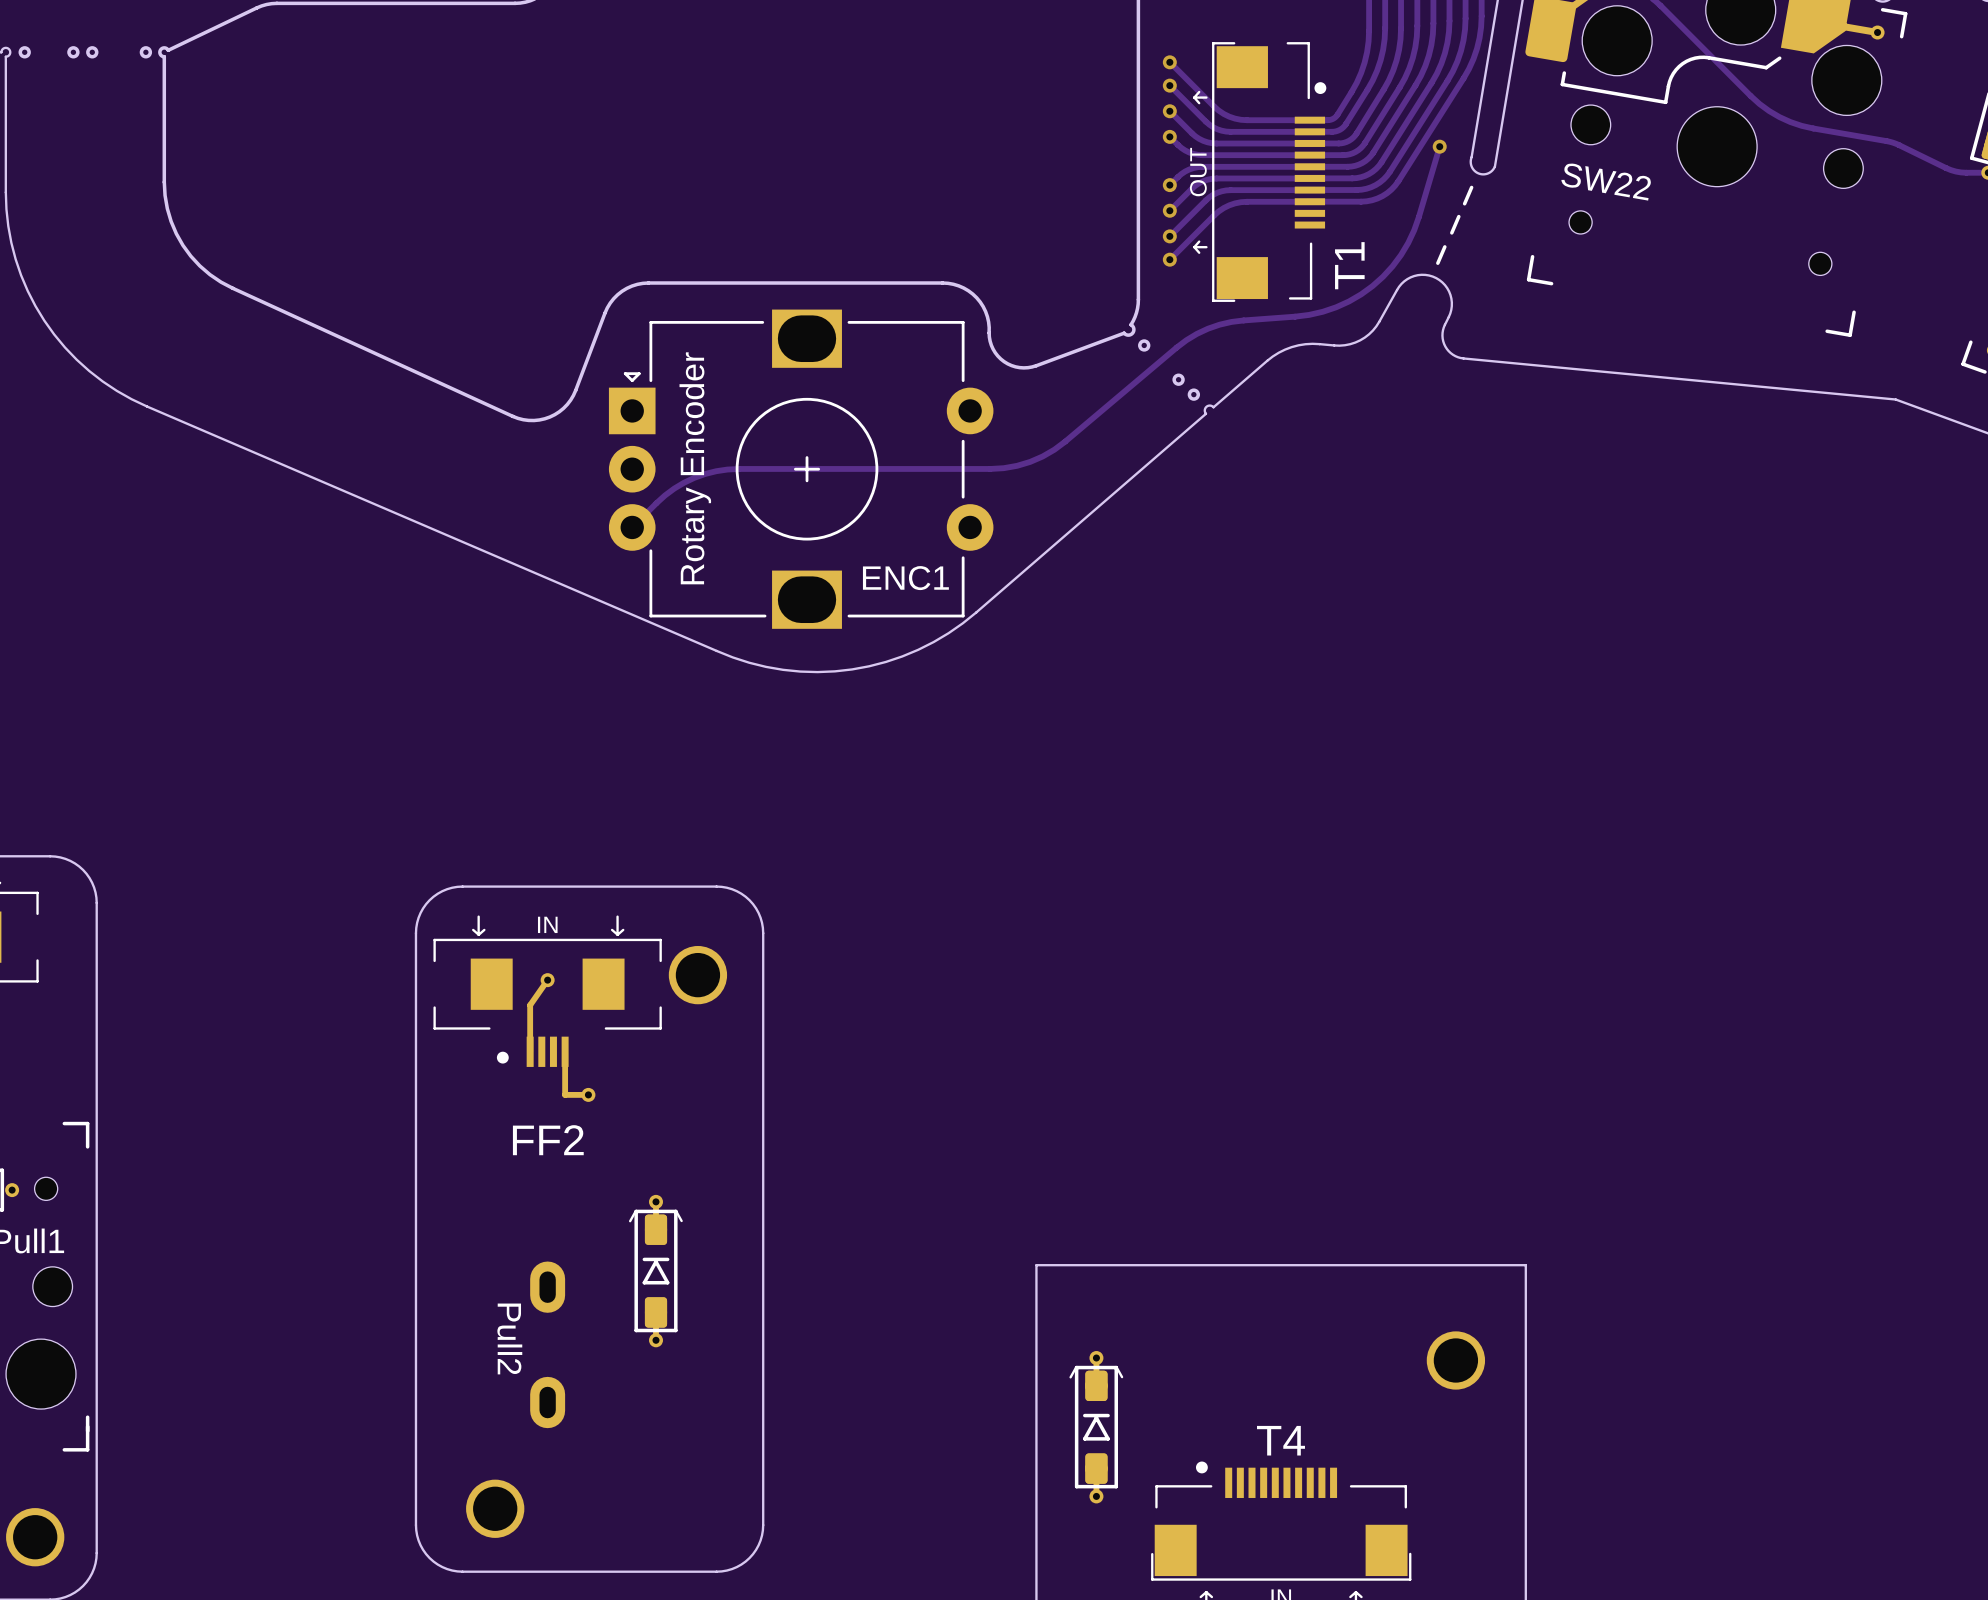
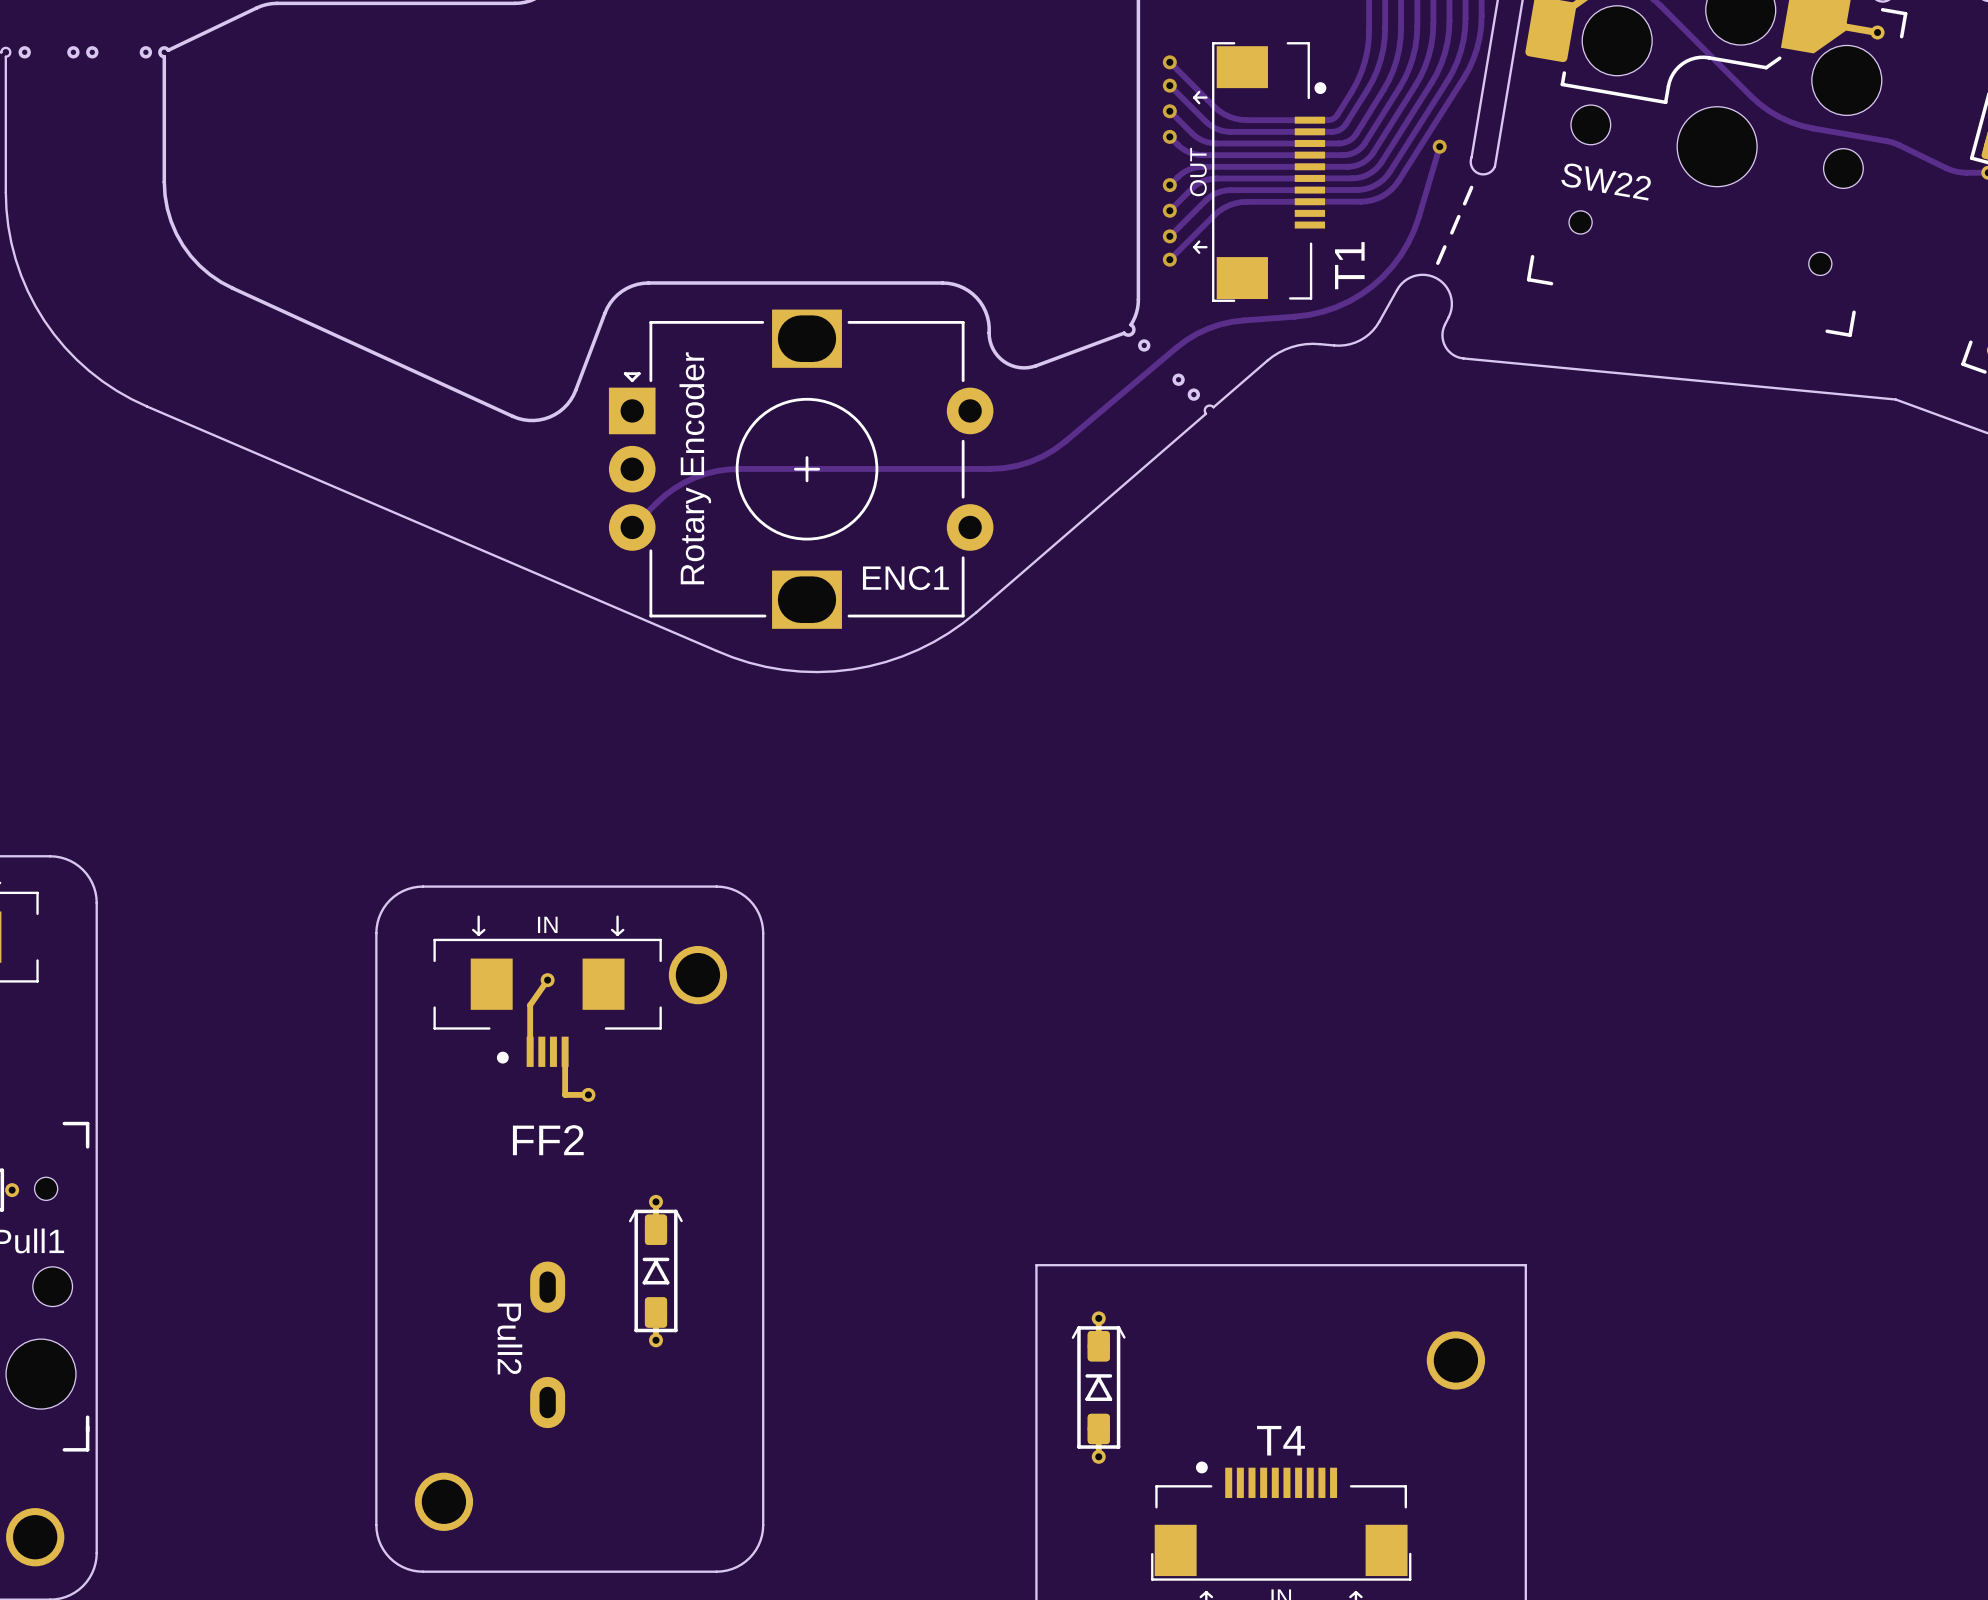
board edge: (462, 886) (442, 891) (429, 900) (420, 912) (415, 933) (416, 1530) (420, 1545) (429, 1558) (442, 1567) (462, 1571) -> (462, 886) (417, 886) (402, 891) (393, 896) (383, 908) (378, 917) (376, 933) (376, 1530) (383, 1549) (390, 1558) (402, 1567) (417, 1571) (462, 1571)
part position: (1096, 1427) -> (1098, 1387)
part position: (495, 1508) -> (443, 1501)

